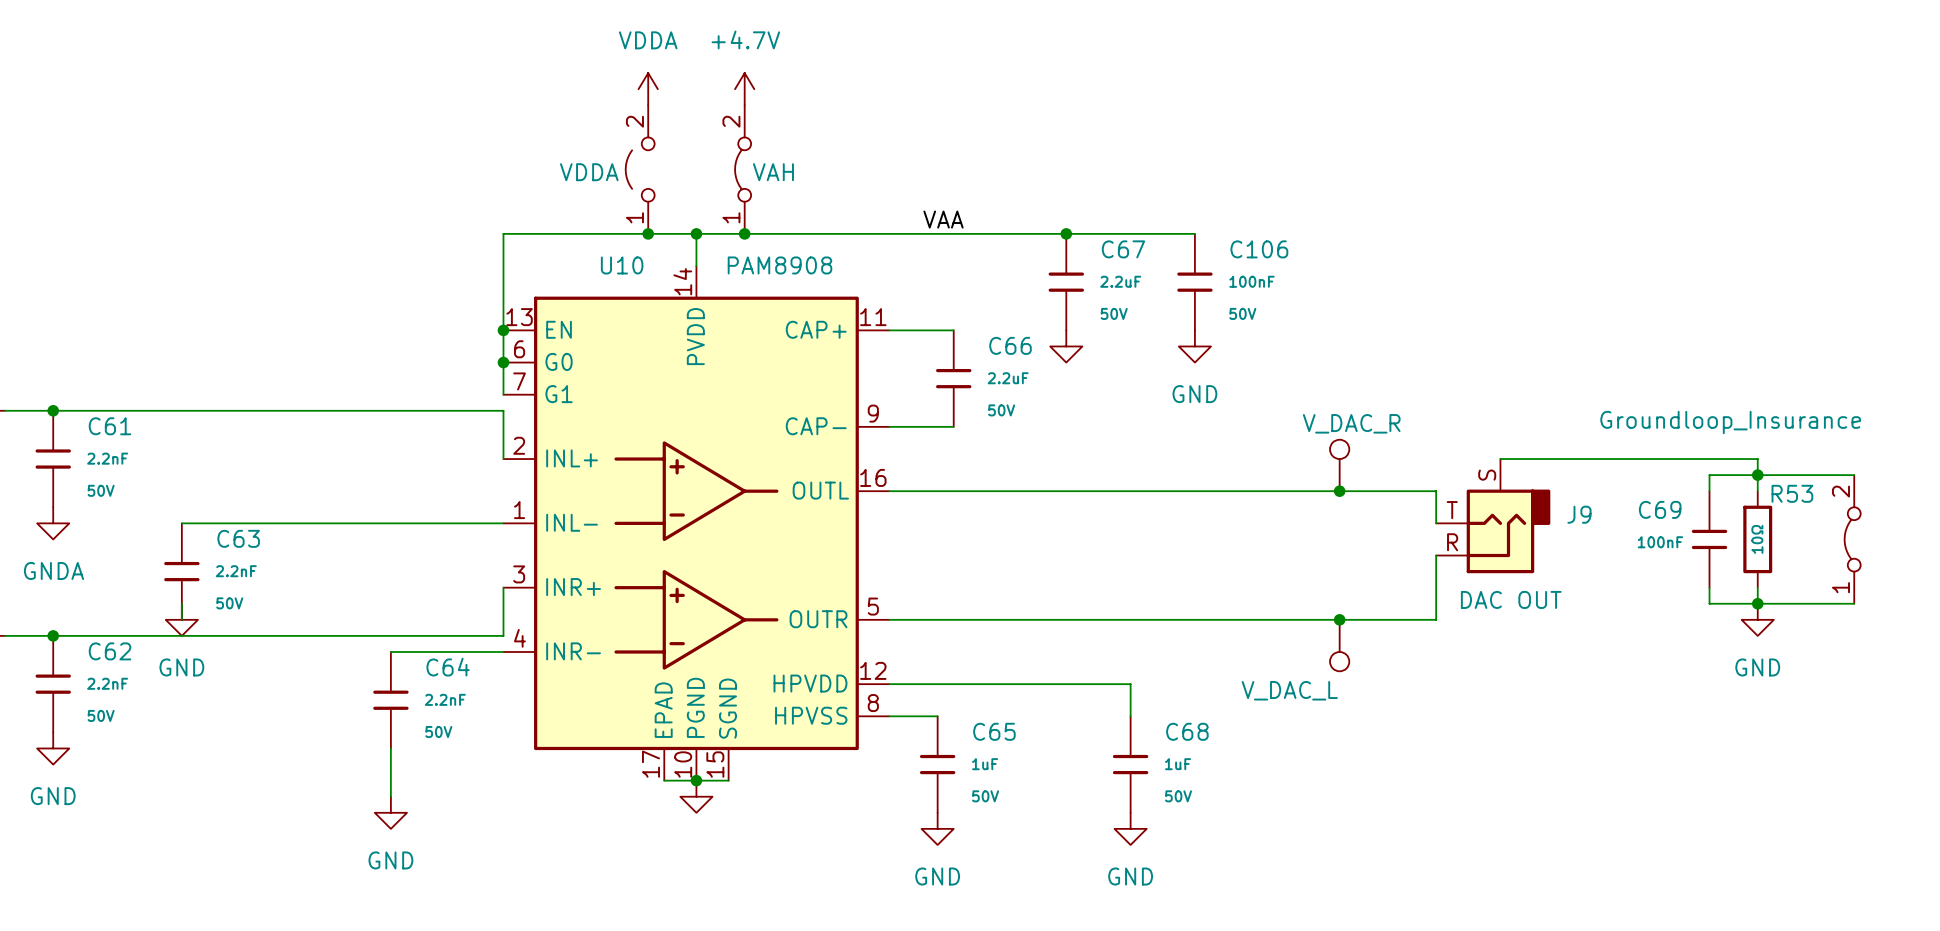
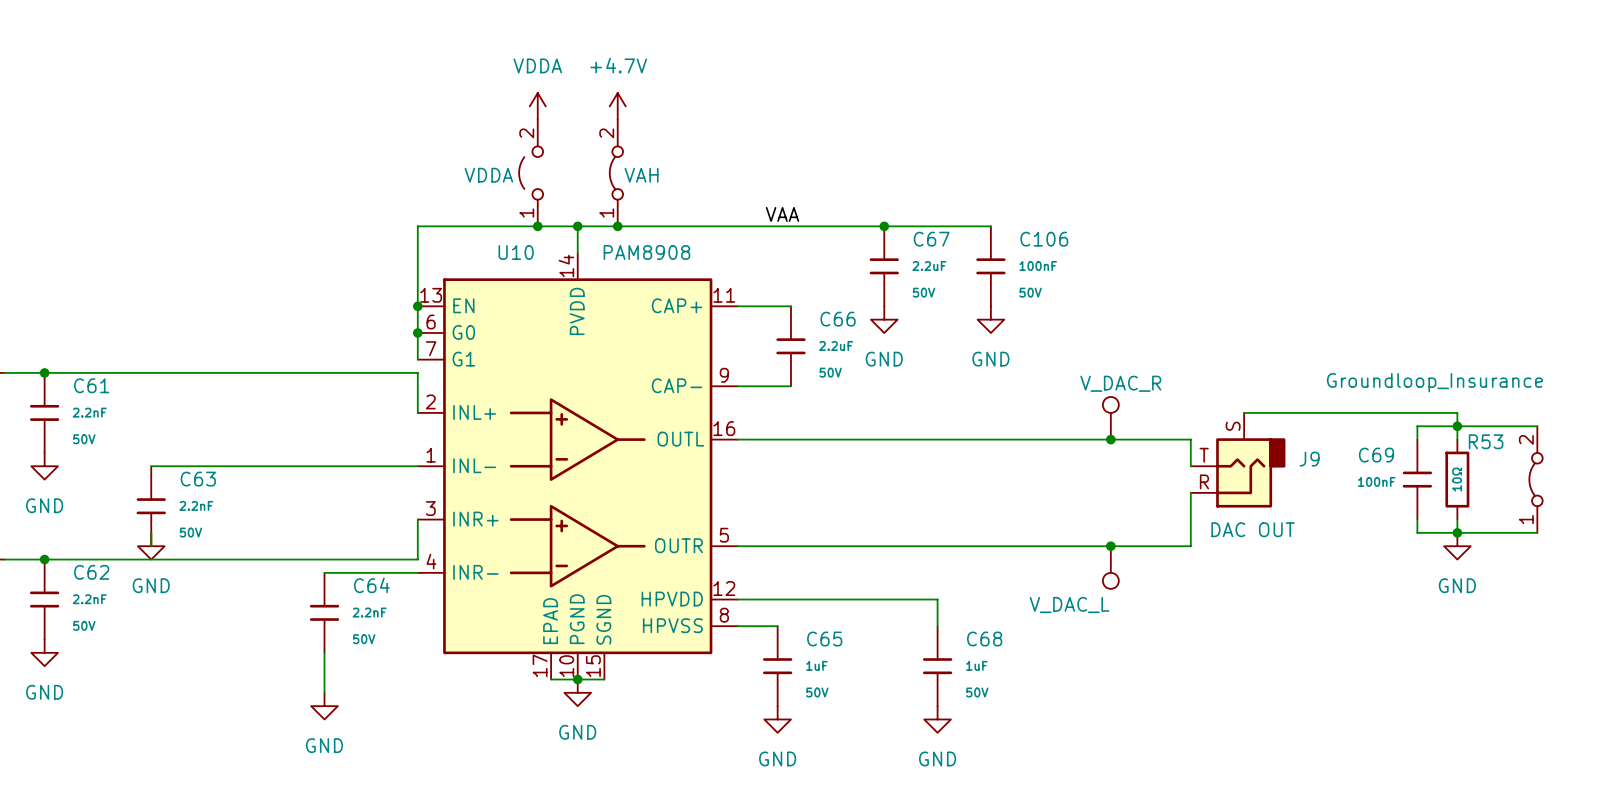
power symbol text: none -> GND (884, 359)
power symbol: GNDA (53, 523) -> GND (44, 466)
power symbol text: none -> GND (577, 732)

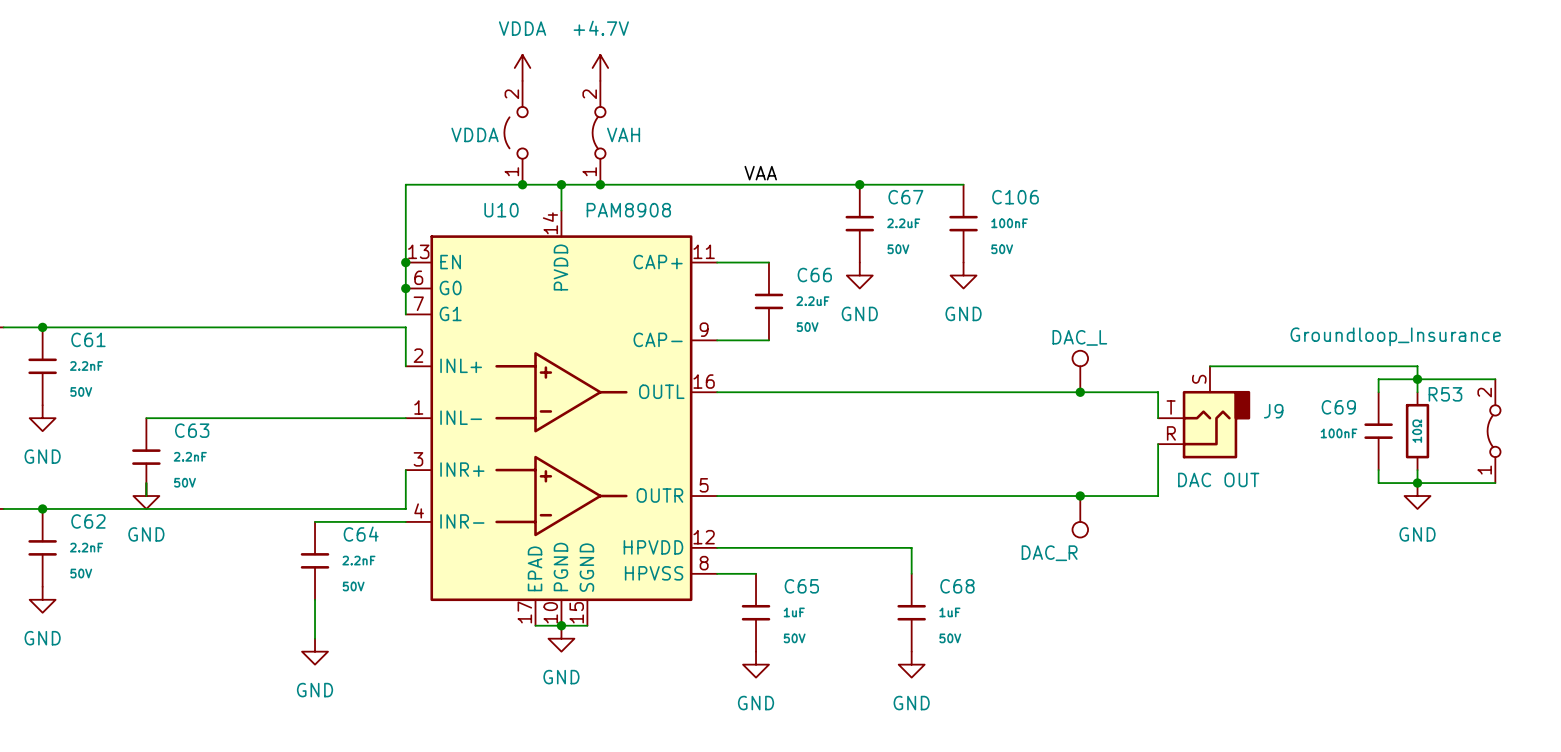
part value: V_DAC_R (1120, 383) -> DAC_L (1079, 337)
part value: V_DAC_L (1069, 605) -> DAC_R (1049, 553)

